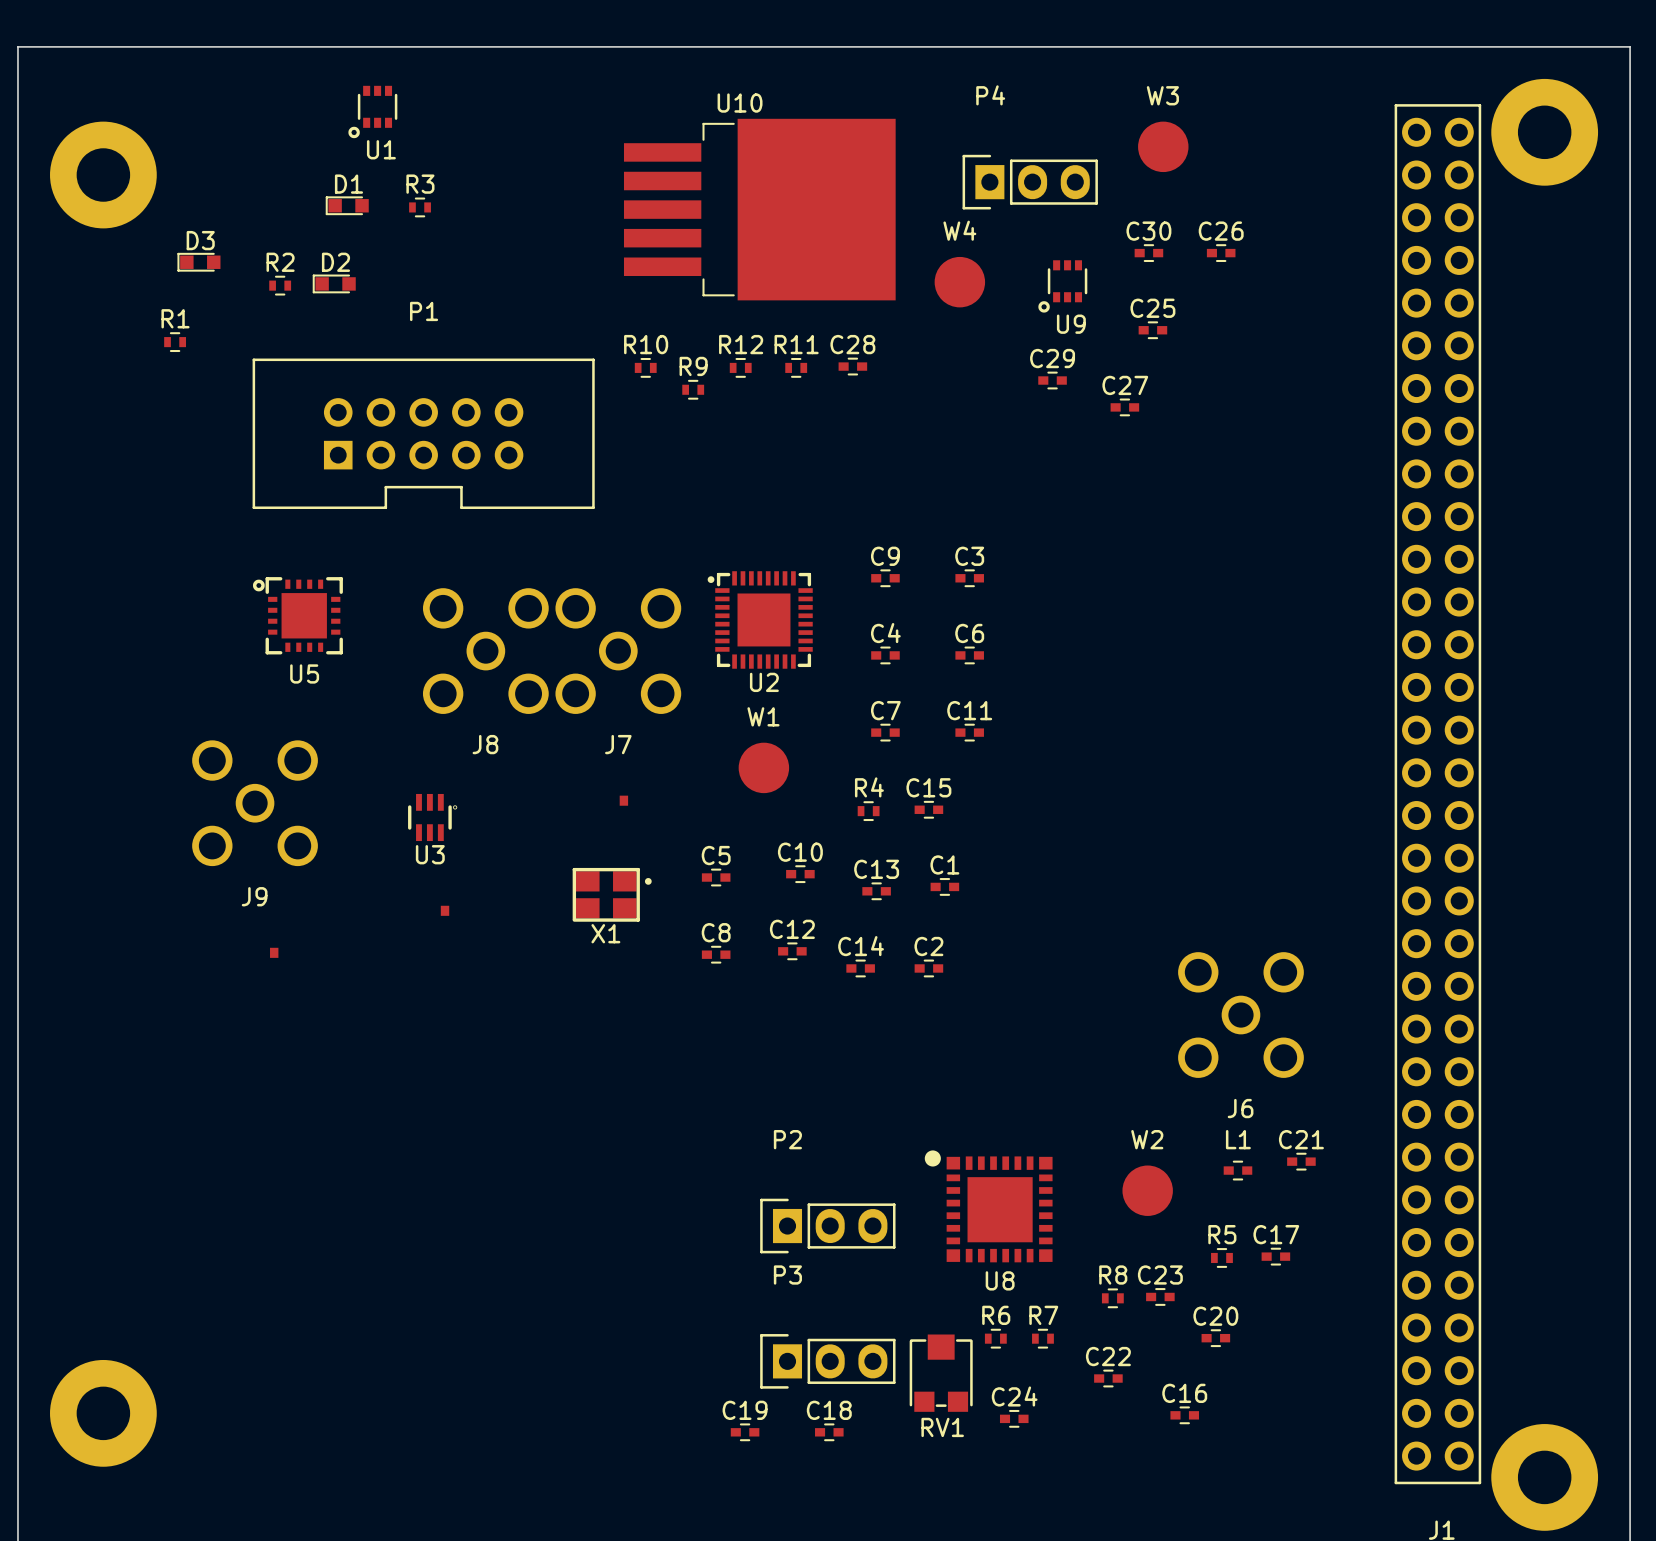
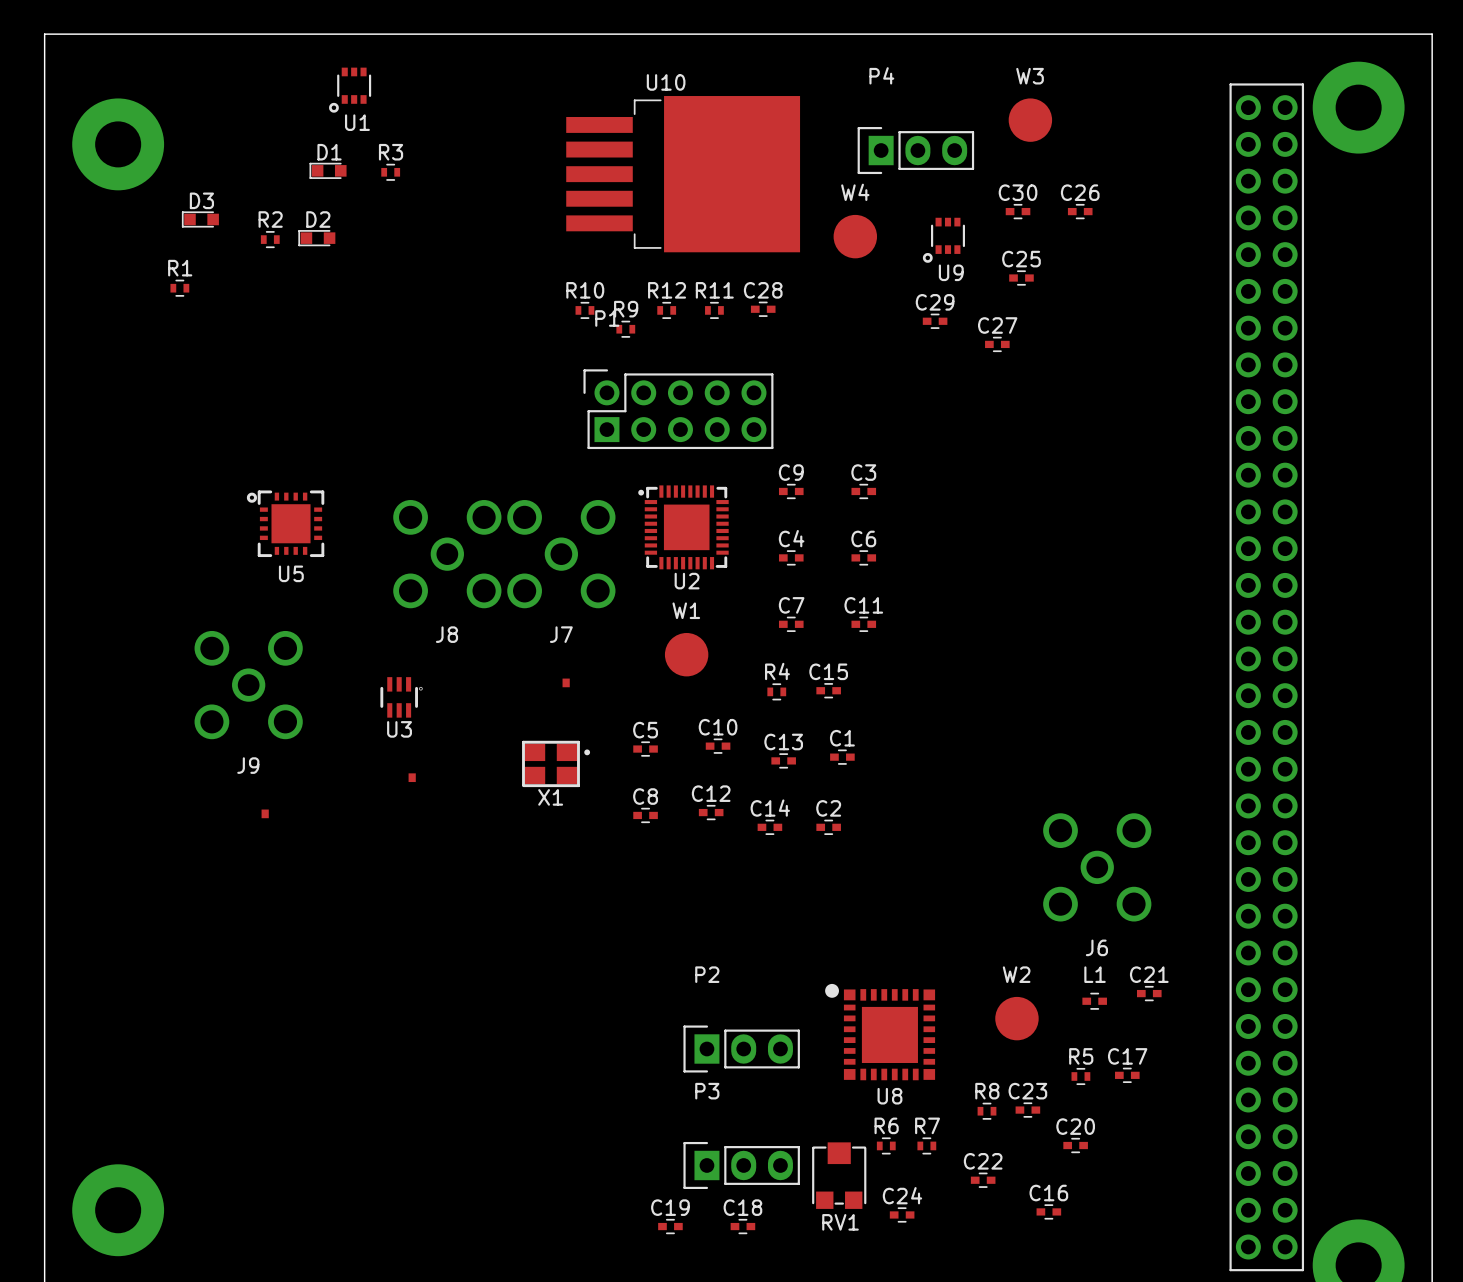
P1 name position: P1 (424, 311) -> P1 (607, 318)
P1 footprint: [252, 358, 595, 510] -> [583, 369, 774, 450]

